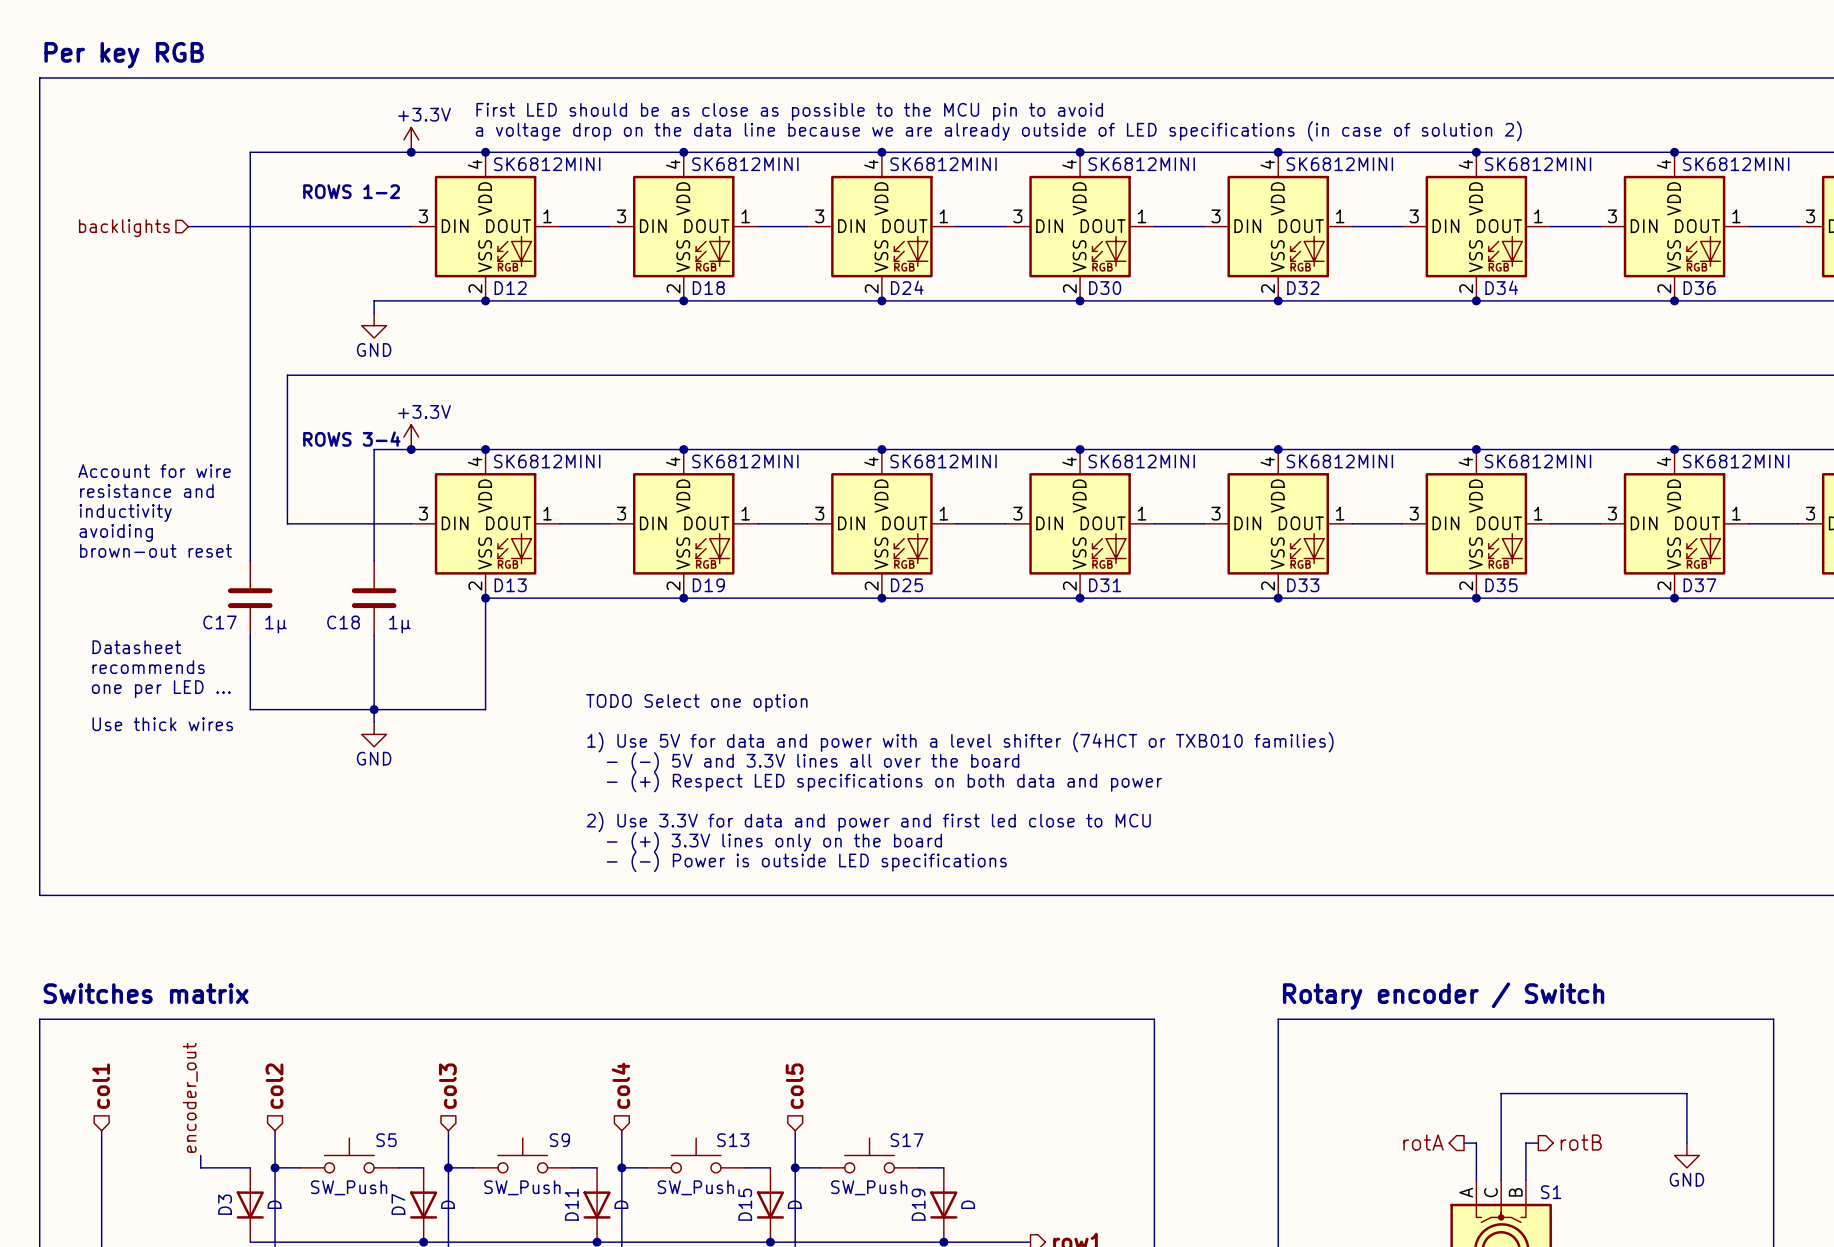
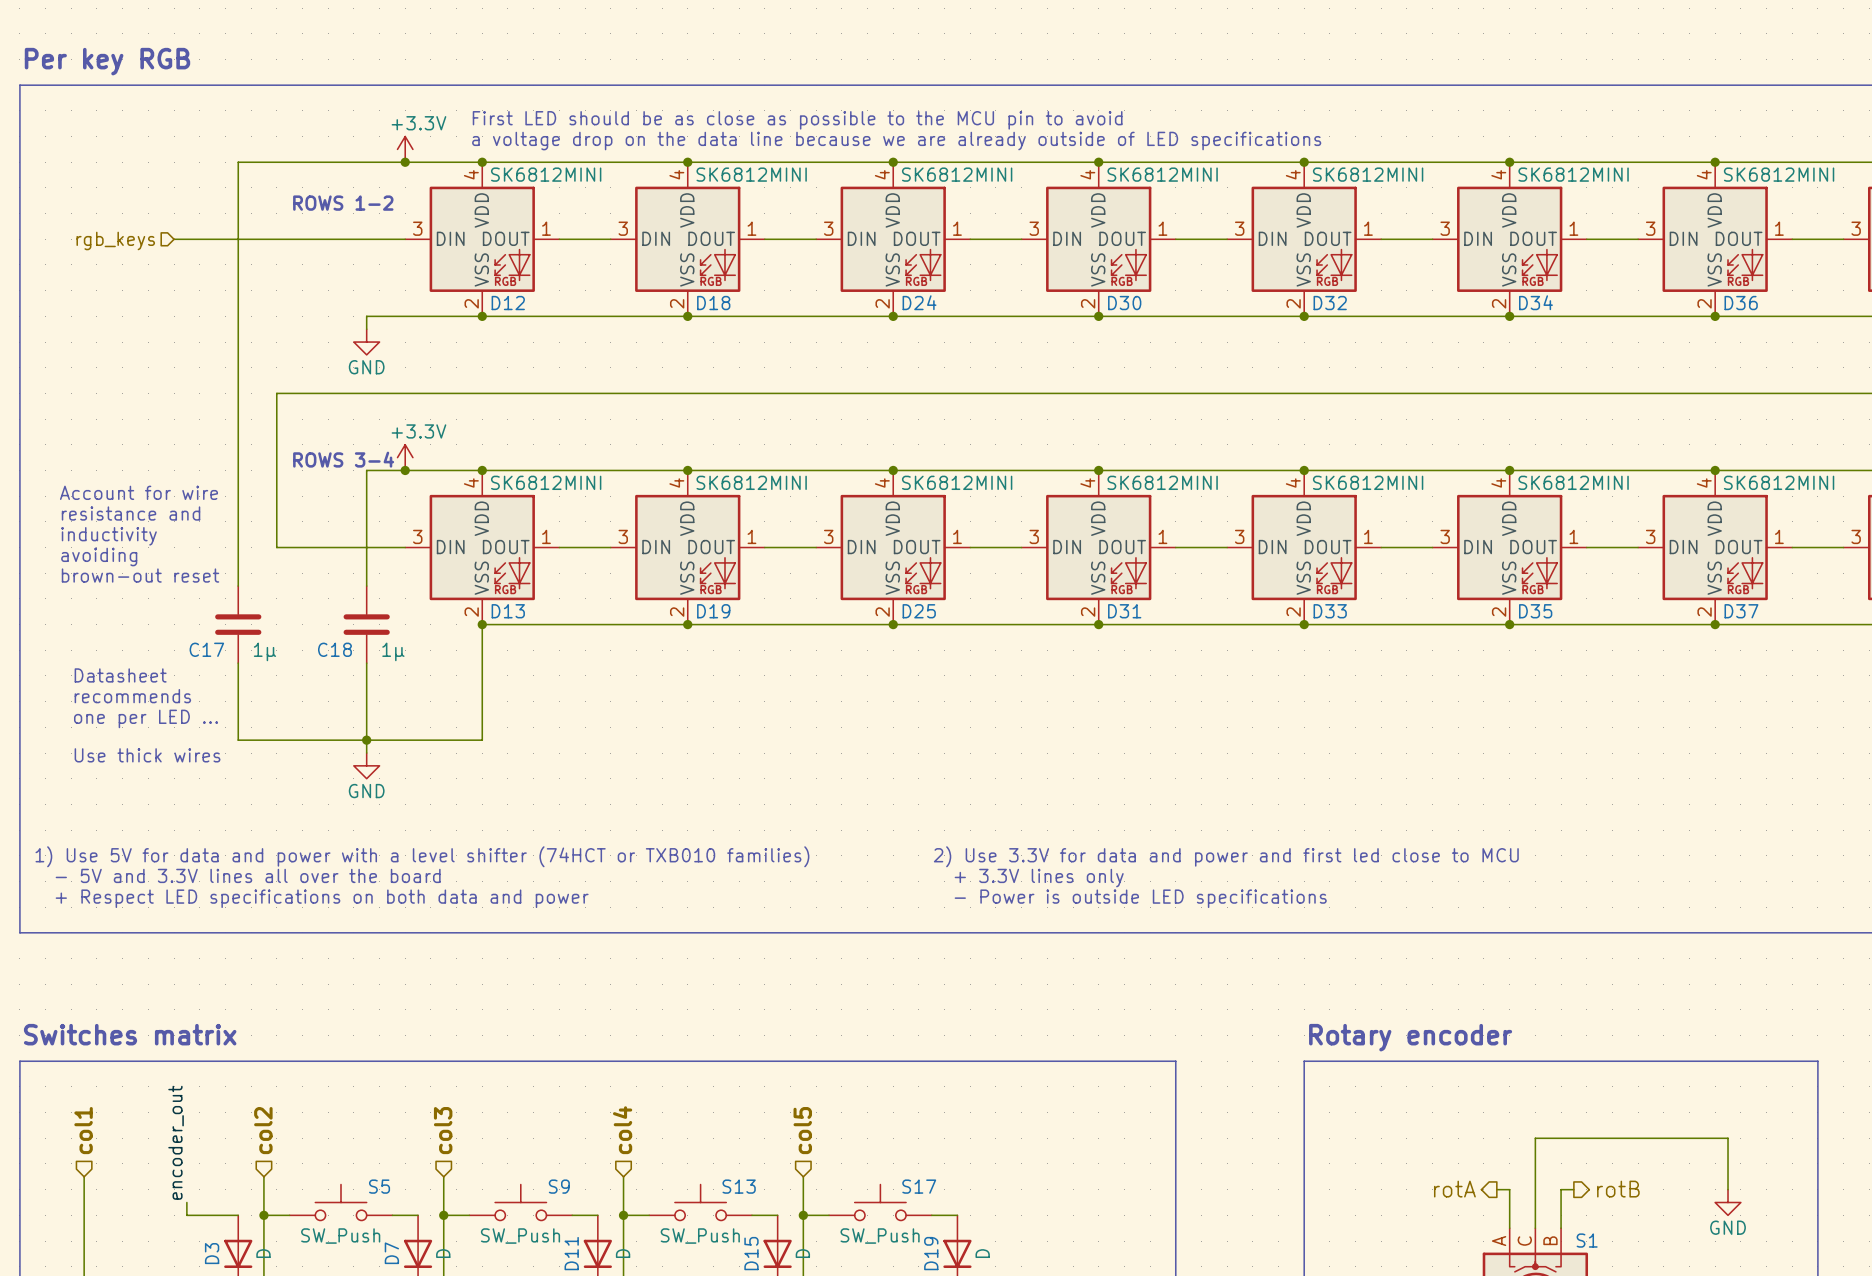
text: a voltage drop on the data line because we are already outside of LED specifications (in case of solution 2) (998, 131) -> a voltage drop on the data line because we are already outside of LED specifications (896, 141)
hierarchical label: backlights (124, 228) -> rgb_keys (115, 240)
text: TODO Select one option (696, 703) -> none
text: 1) Use 5V for data and power with a level shifter (74HCT or TXB010 families) (960, 742) -> none
text: - (-) 5V and 3.3V lines all over the board (813, 762) -> none
text: - (+) Respect LED specifications on both data and power (884, 782) -> none
text: none -> 1) Use 5V for data and power with a level shifter (74HCT or TXB010 families) (422, 856)
text: 2) Use 3.3V for data and power and first led close to MCU (868, 822) -> none
text: none -> 2) Use 3.3V for data and power and first led close to MCU (1226, 856)
text: none -> - 5V and 3.3V lines all over the board (248, 875)
text: - (+) 3.3V lines only on the board (774, 842) -> none
text: none -> + 3.3V lines only (1039, 878)
text: - (-) Power is outside LED specifications (806, 861) -> none
text: none -> + Respect LED specifications on both data and power (322, 898)
text: none -> - Power is outside LED specifications (1140, 898)
text: Rotary encoder / Switch (1443, 996) -> Rotary encoder (1410, 1037)

